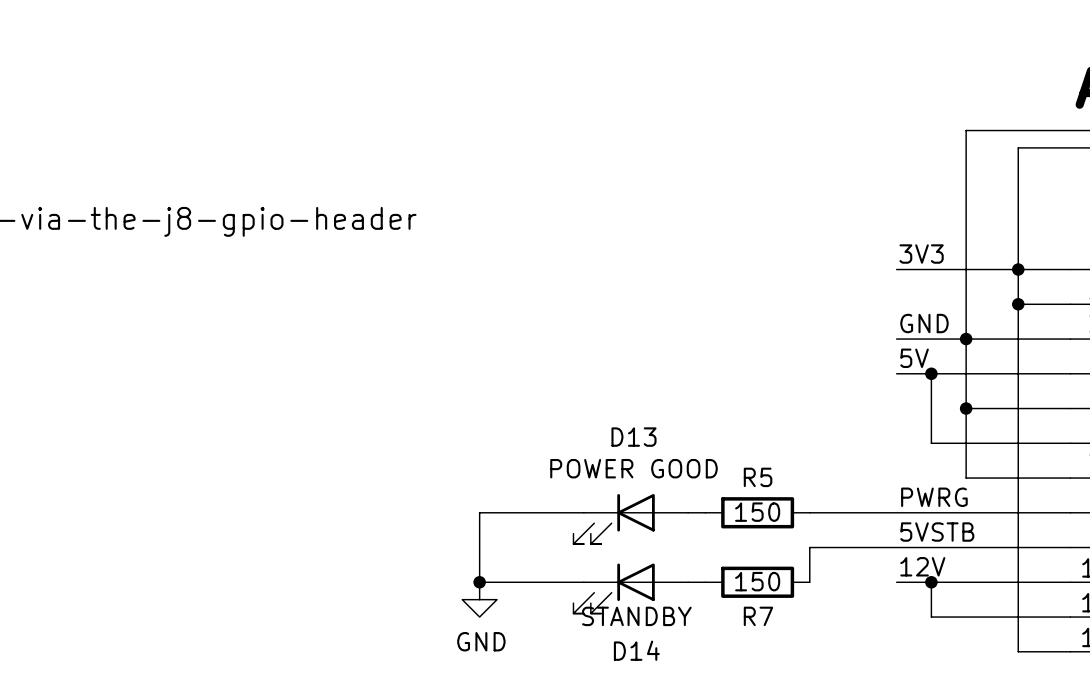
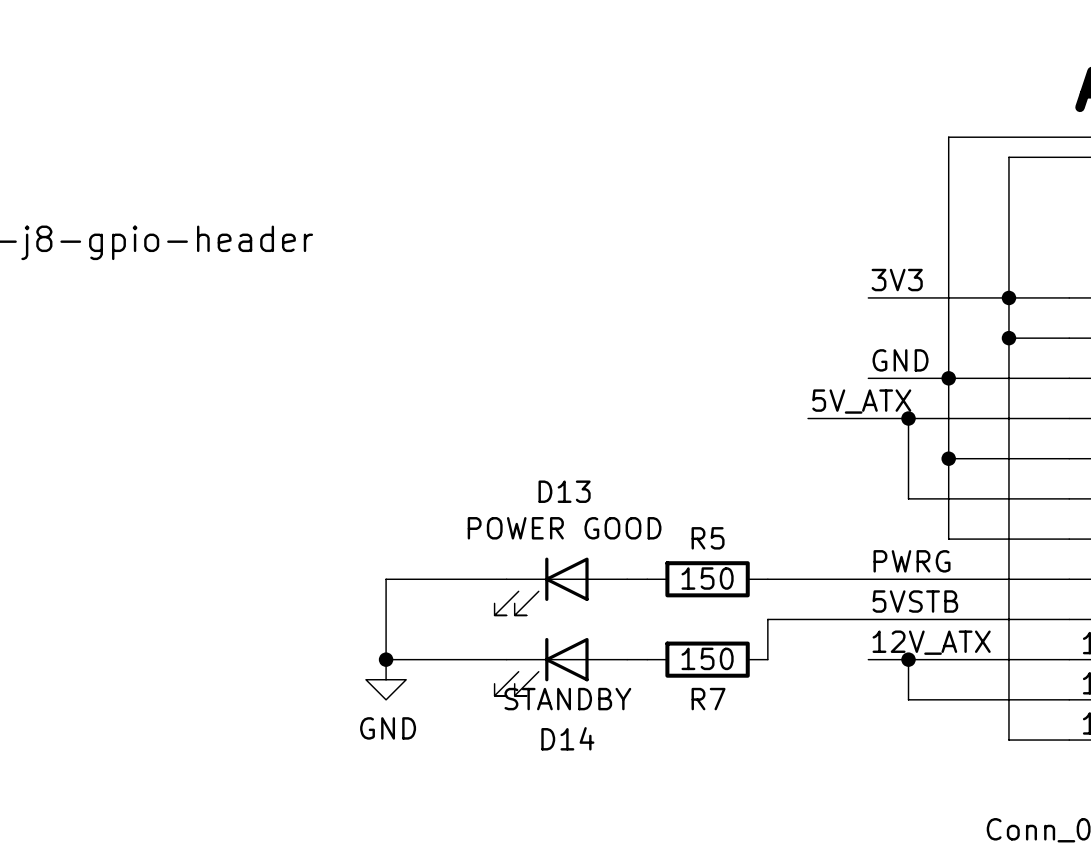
label: 5V (914, 358) -> none
label: none -> 5V_ATX (861, 401)
wire: none -> (808, 418) (868, 418)
label: 12V (922, 566) -> 12V_ATX (931, 642)

